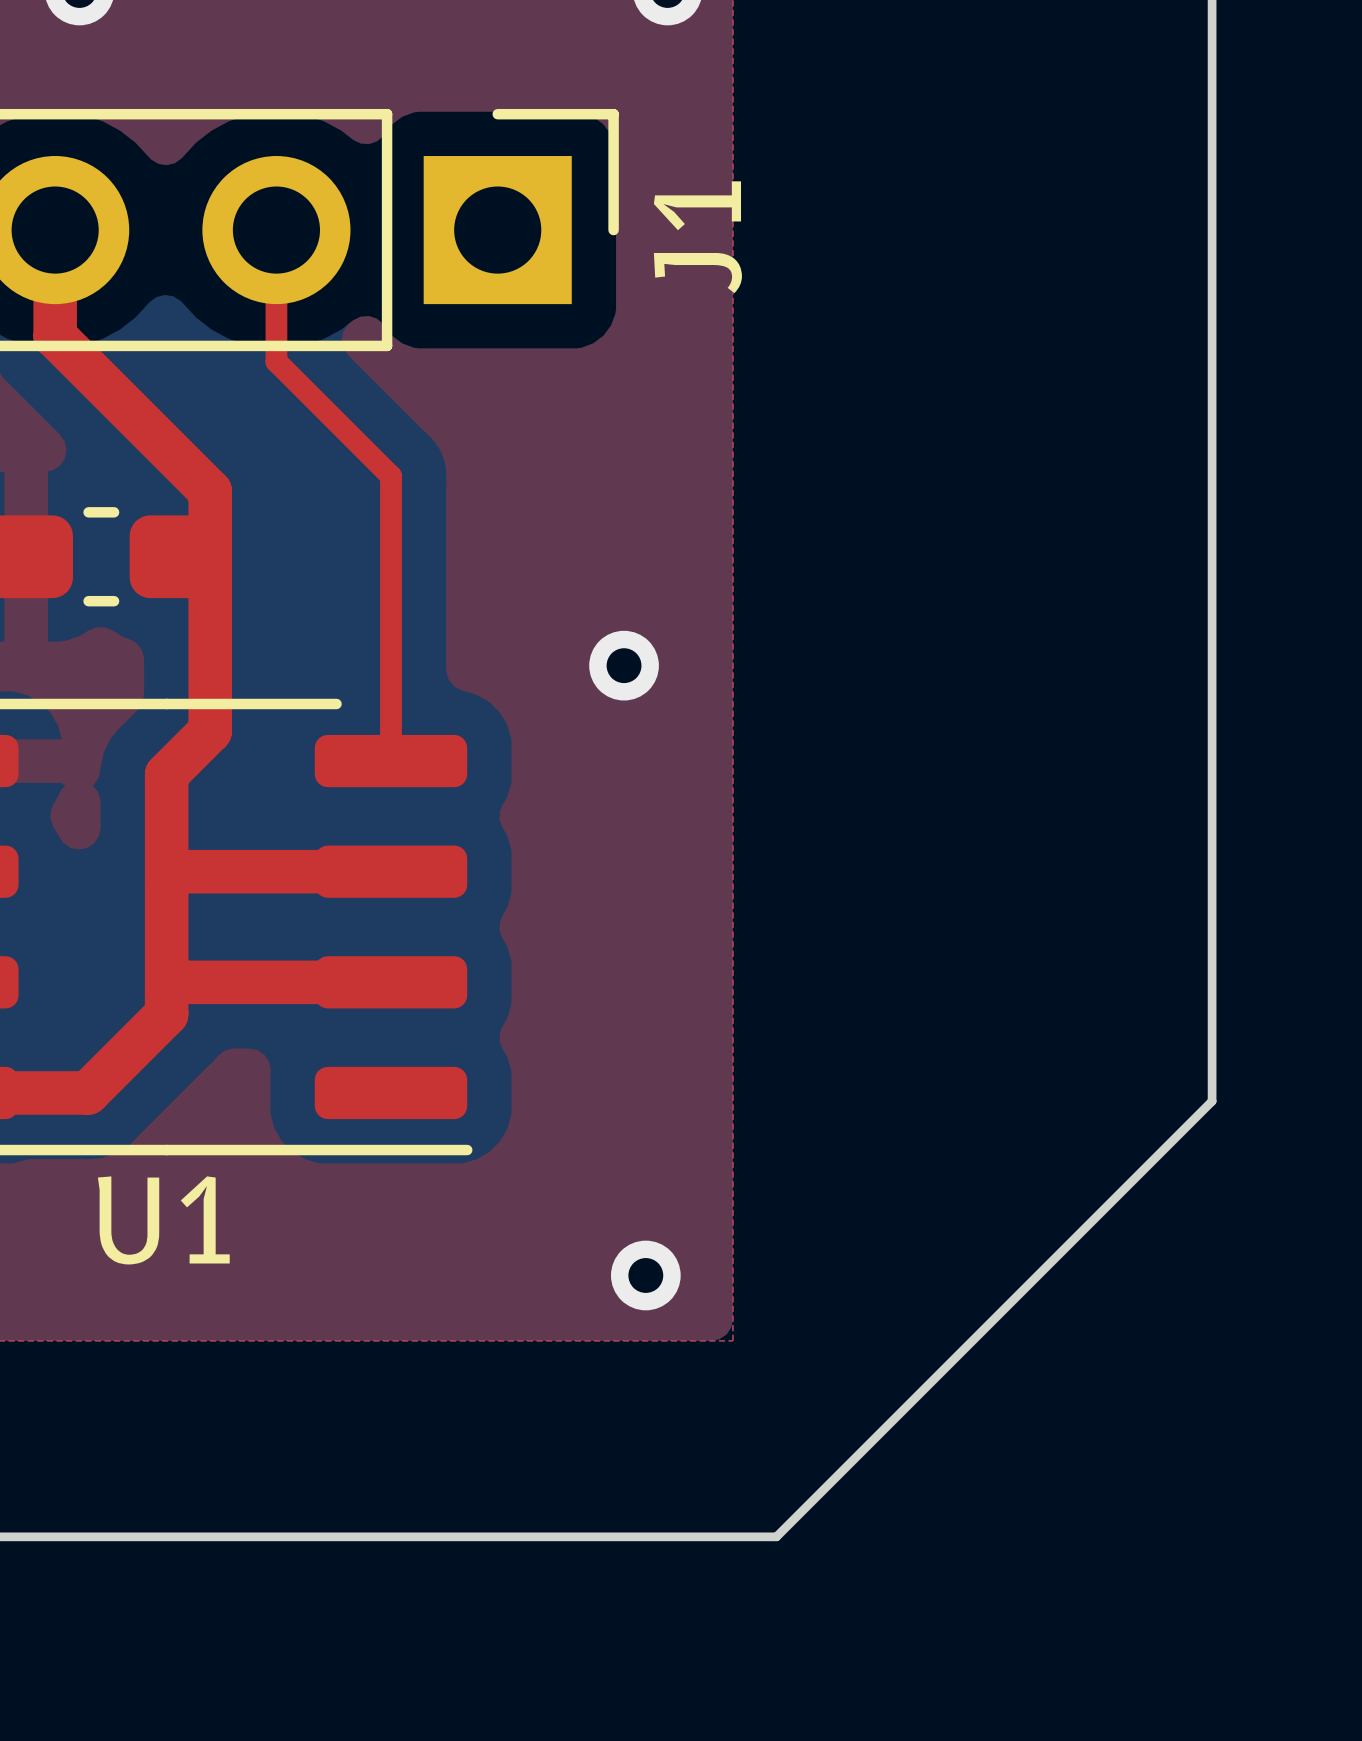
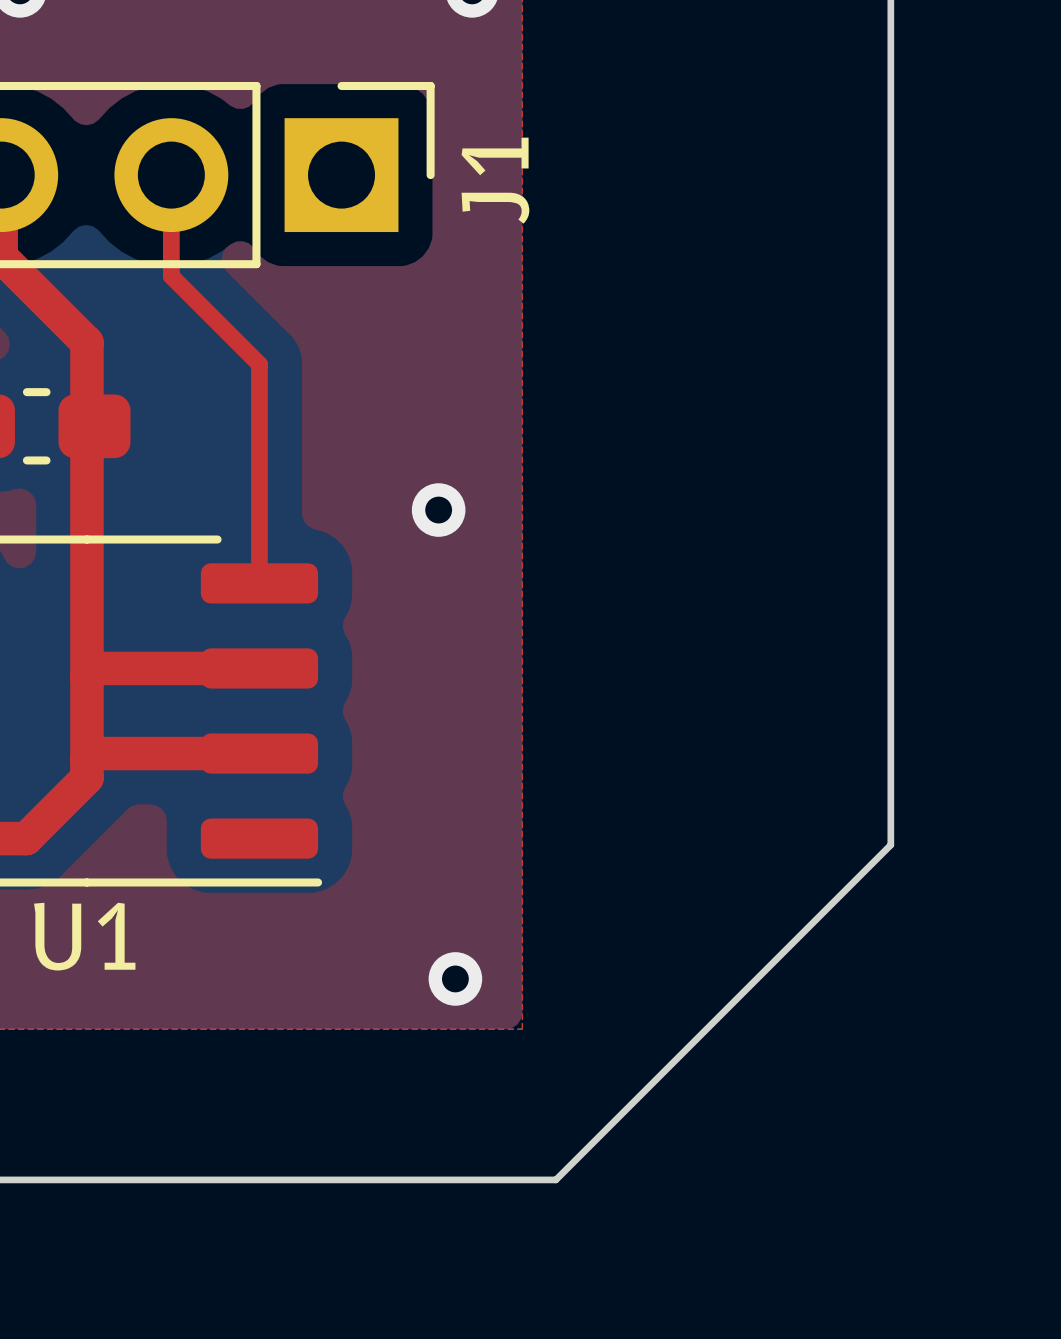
top track: (166, 447) (210, 491) (210, 730) (166, 774) -> (86, 342) (86, 593)

